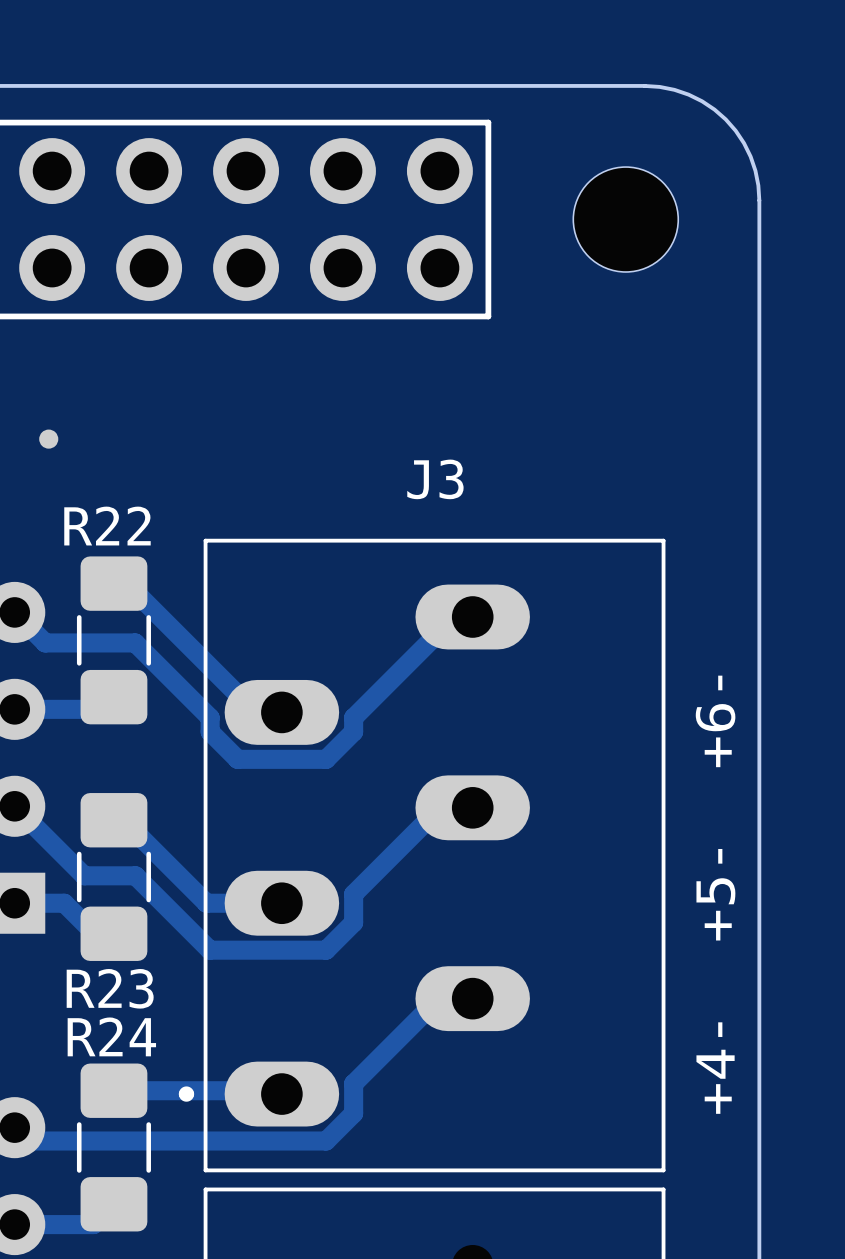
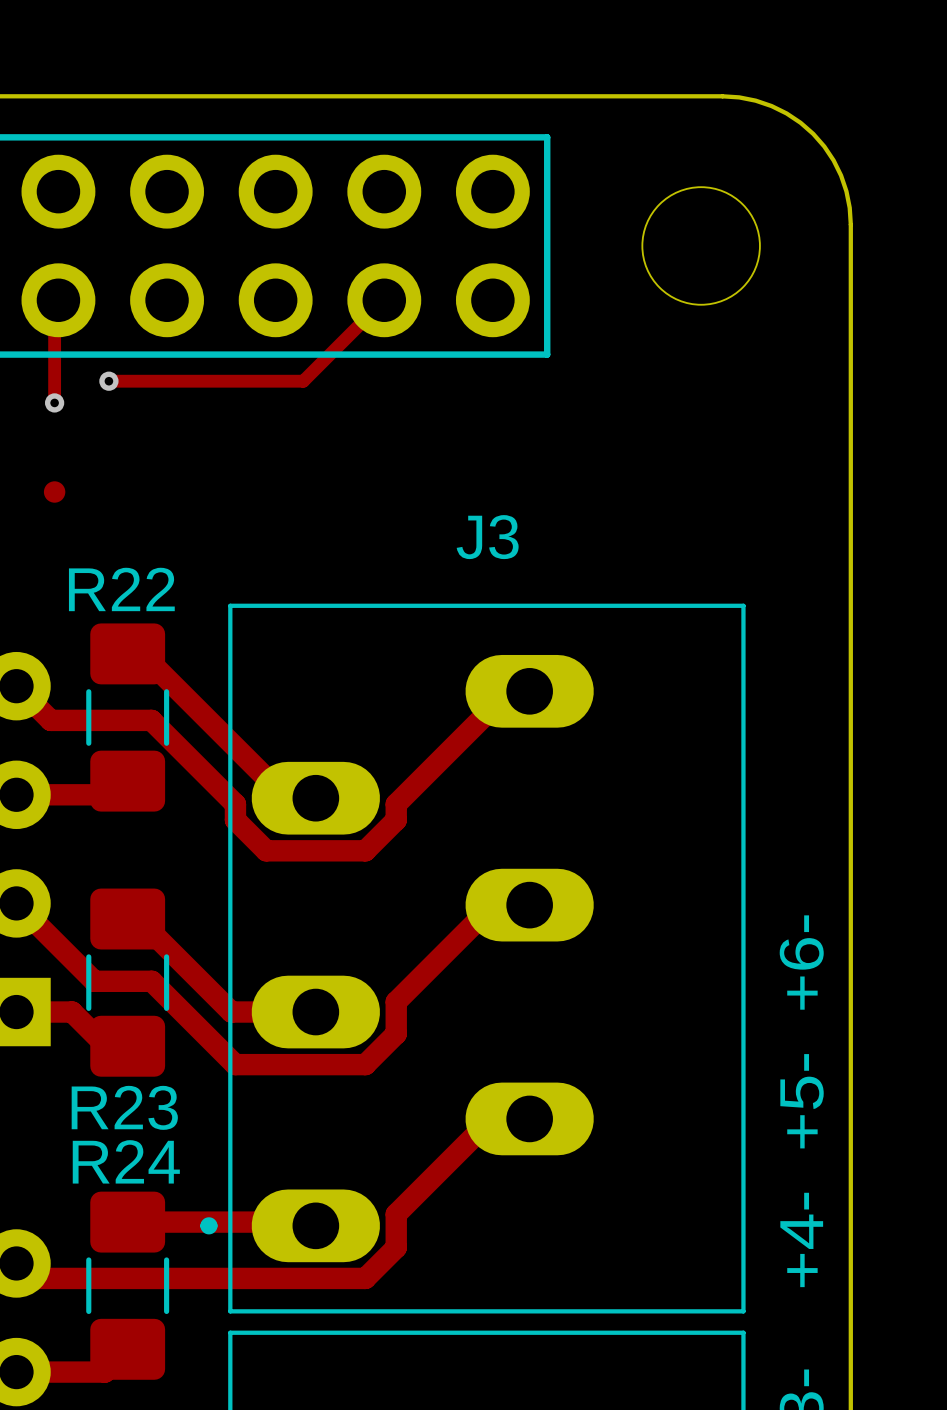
track: none -> (58, 300) (54, 304) (54, 402)
track: none -> (384, 300) (303, 381) (108, 381)
via: none -> (108, 381)
via: none -> (54, 402)

